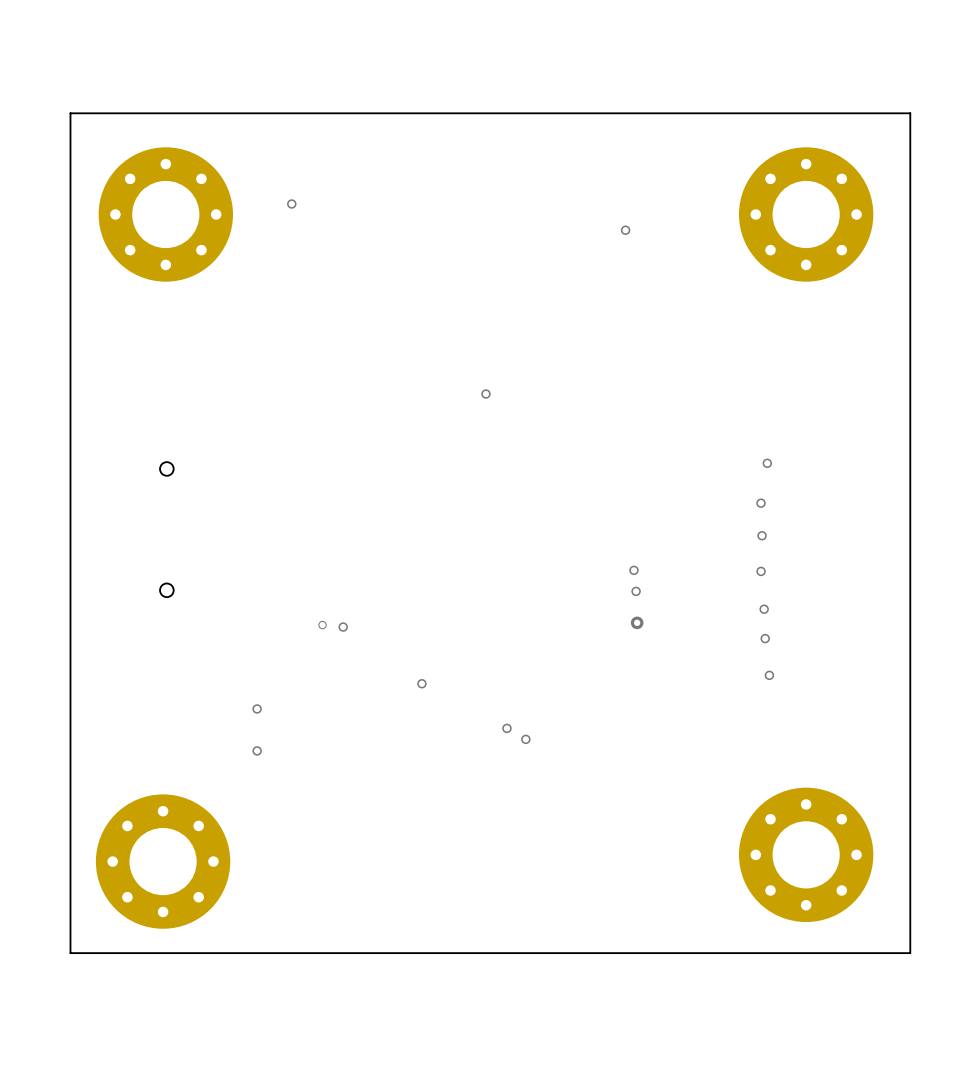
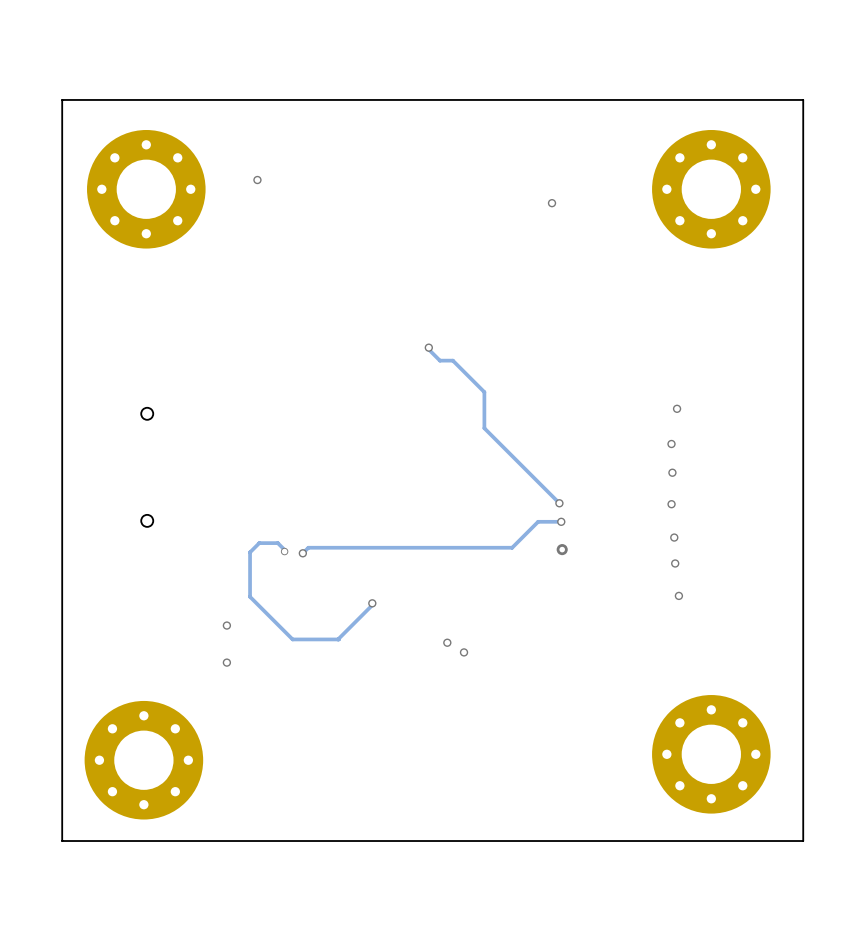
track: none -> (428, 347) (439, 360) (452, 360) (484, 392) (484, 428) (559, 503)
track: none -> (561, 521) (538, 521) (512, 547) (308, 547) (302, 553)
track: none -> (284, 551) (277, 543) (259, 543) (250, 552) (250, 596) (292, 639) (338, 639)
track: none -> (372, 603) (338, 639)

